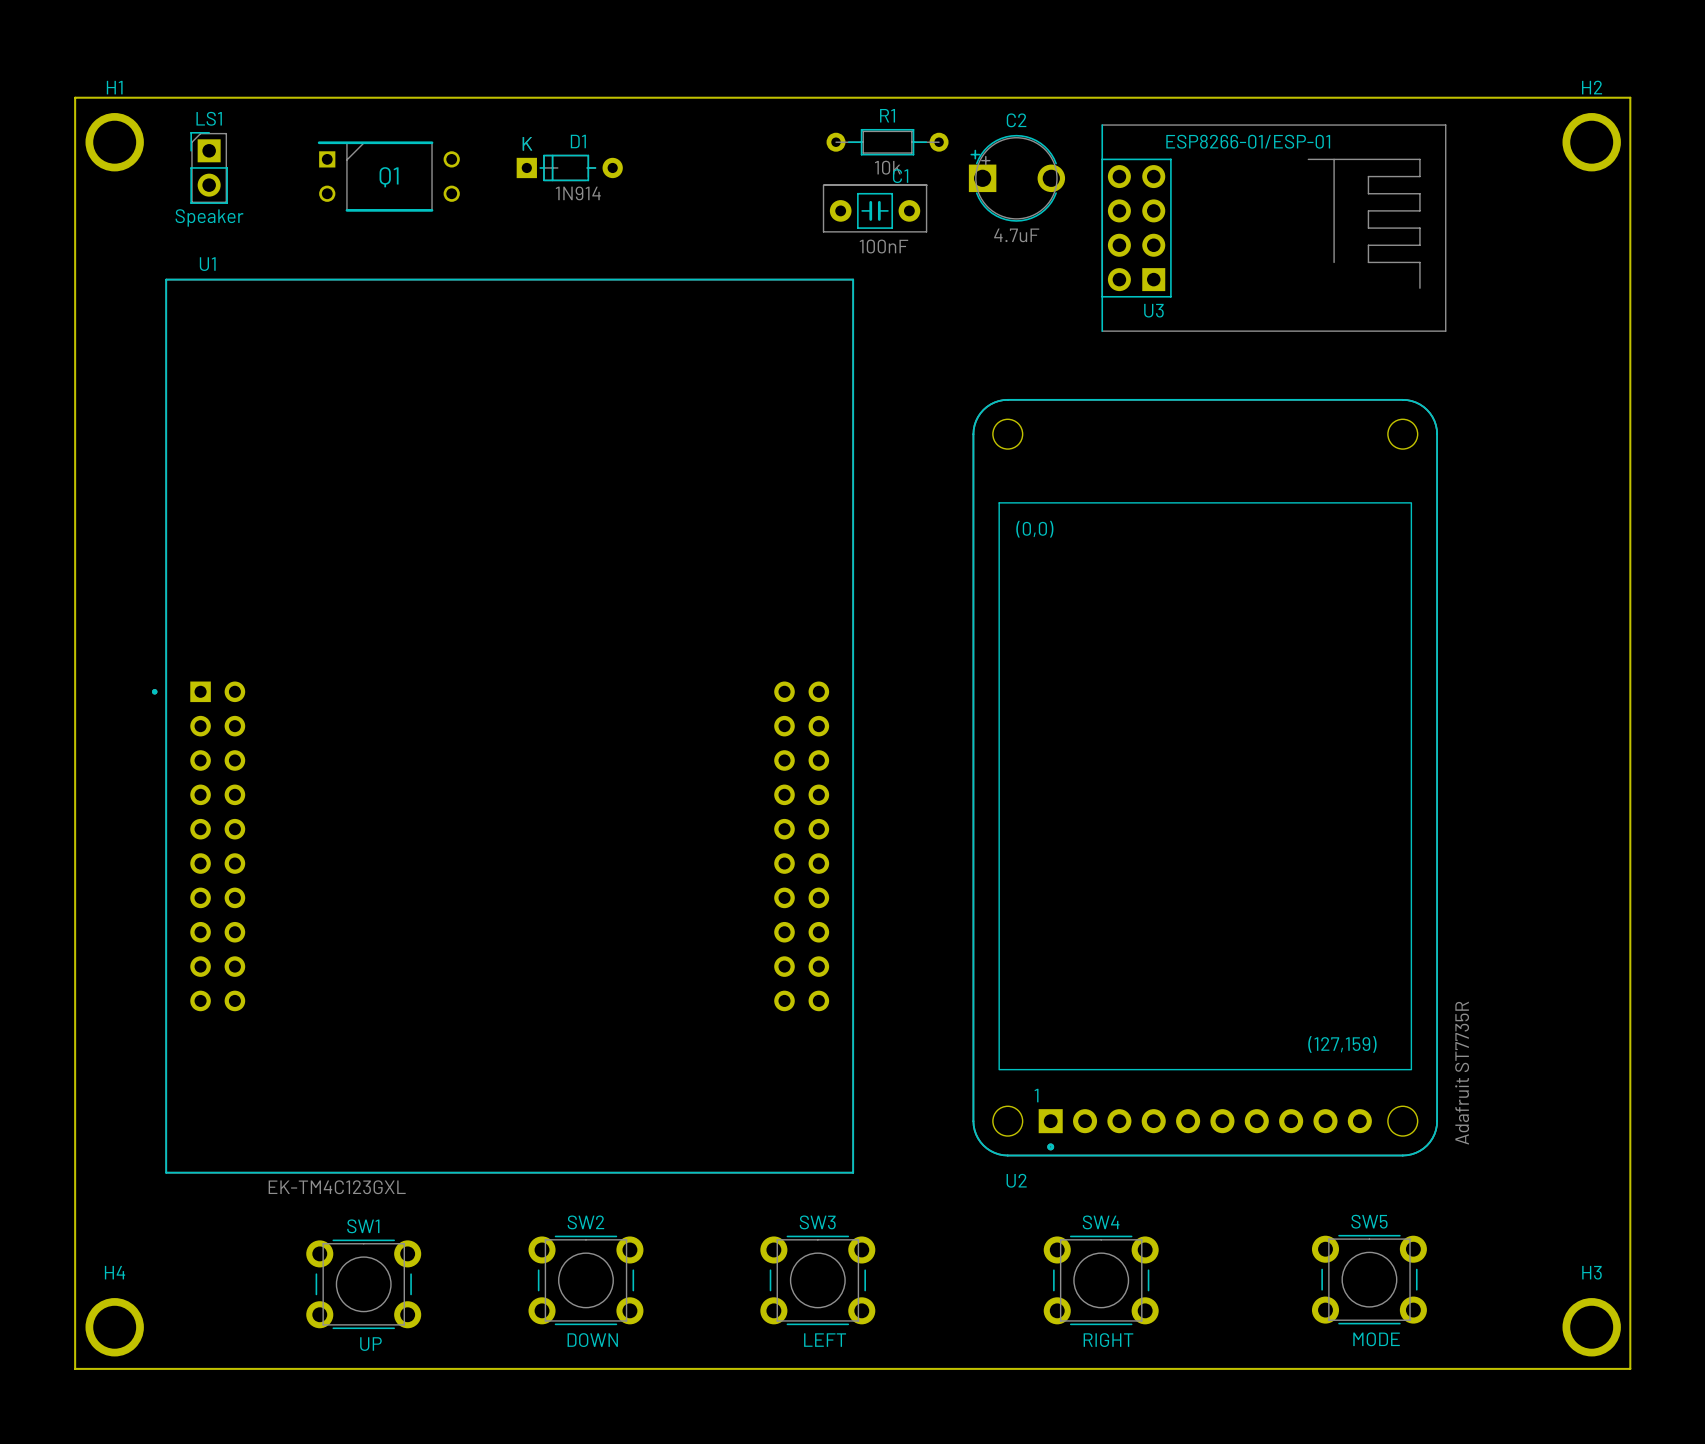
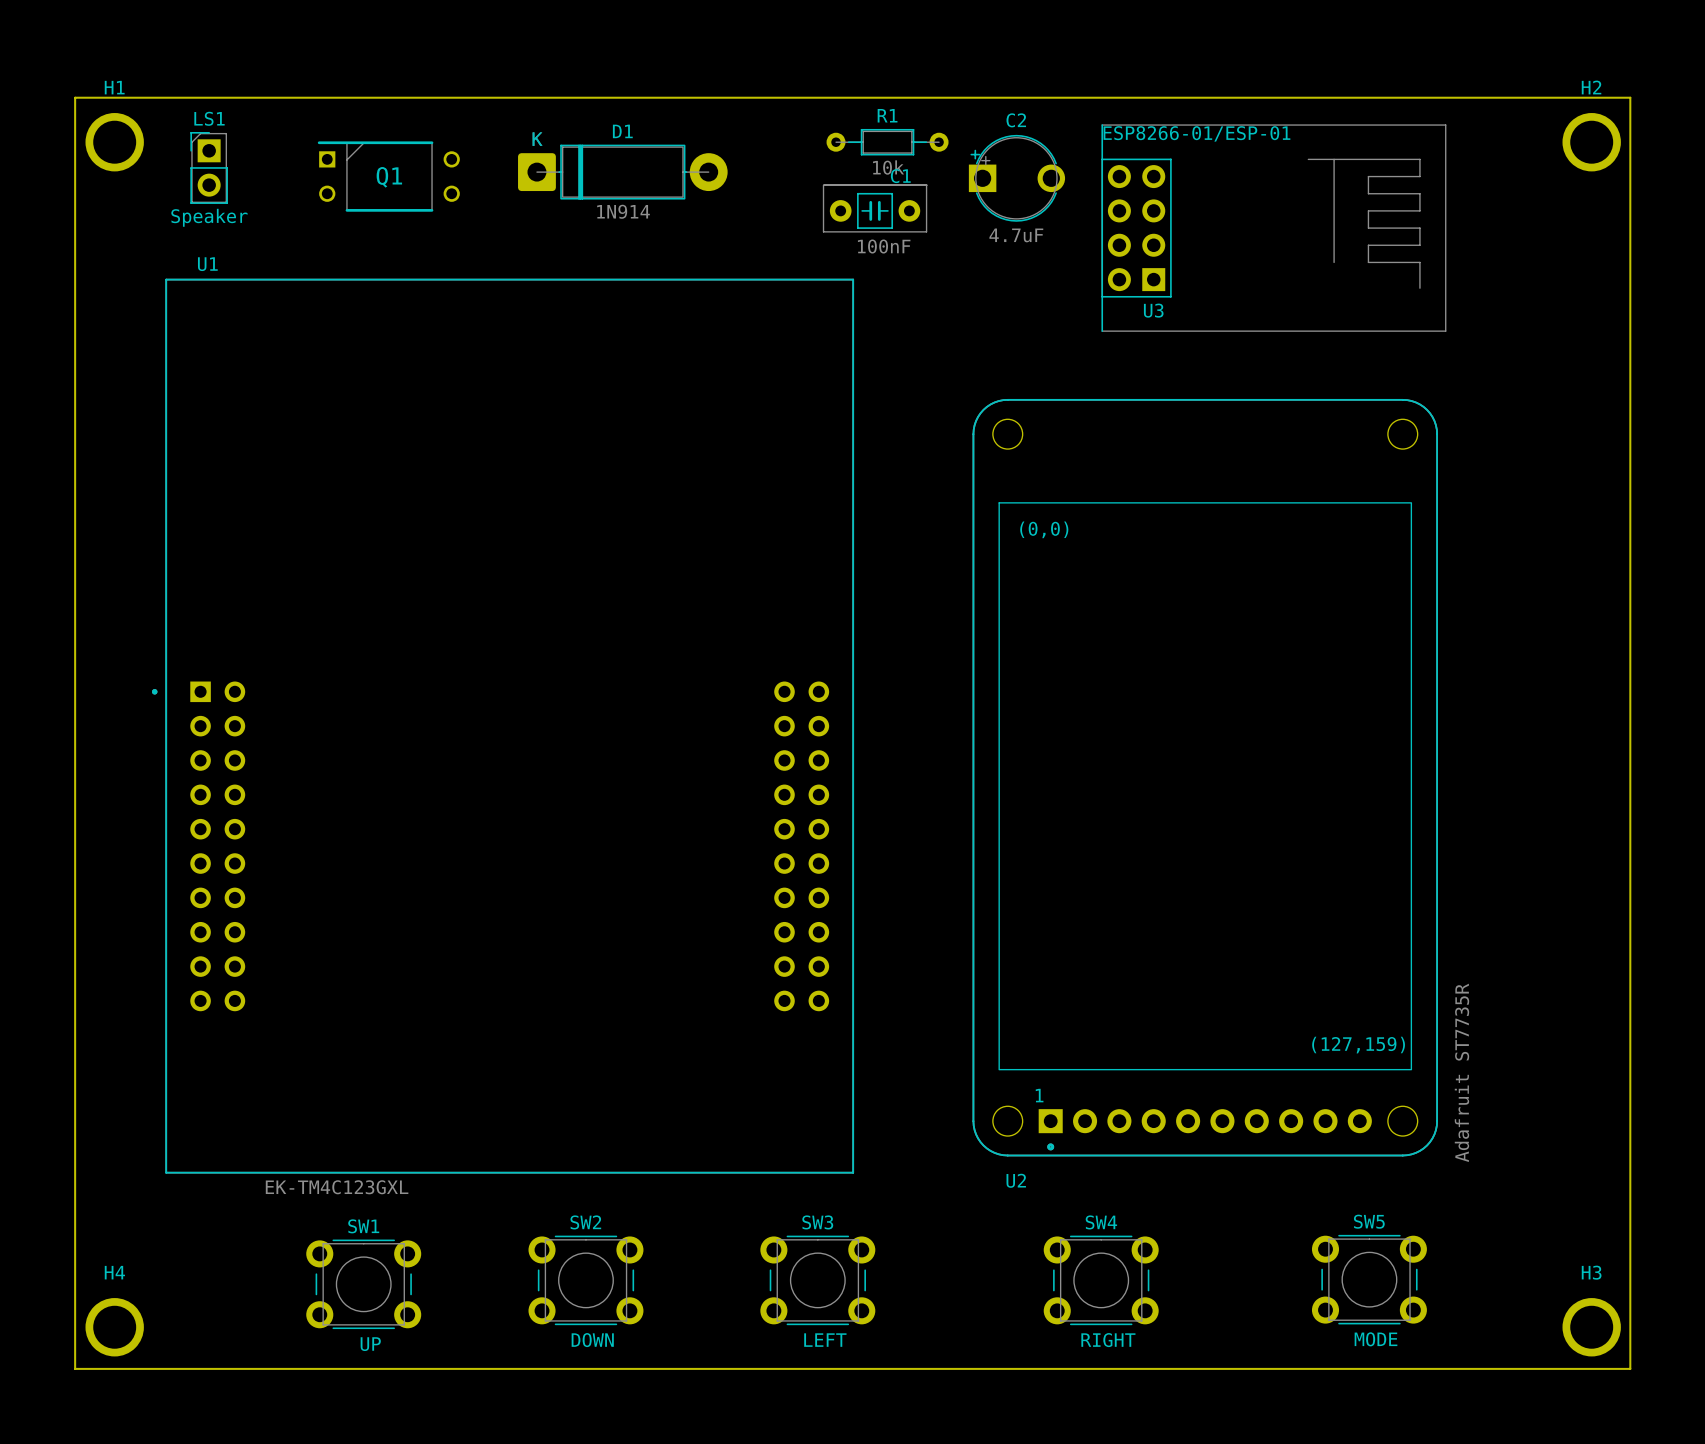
U3 value position: ESP8266-01/ESP-01 (1248, 141) -> ESP8266-01/ESP-01 (1196, 133)
D1 footprint: [516, 154, 623, 182] -> [518, 144, 728, 200]

